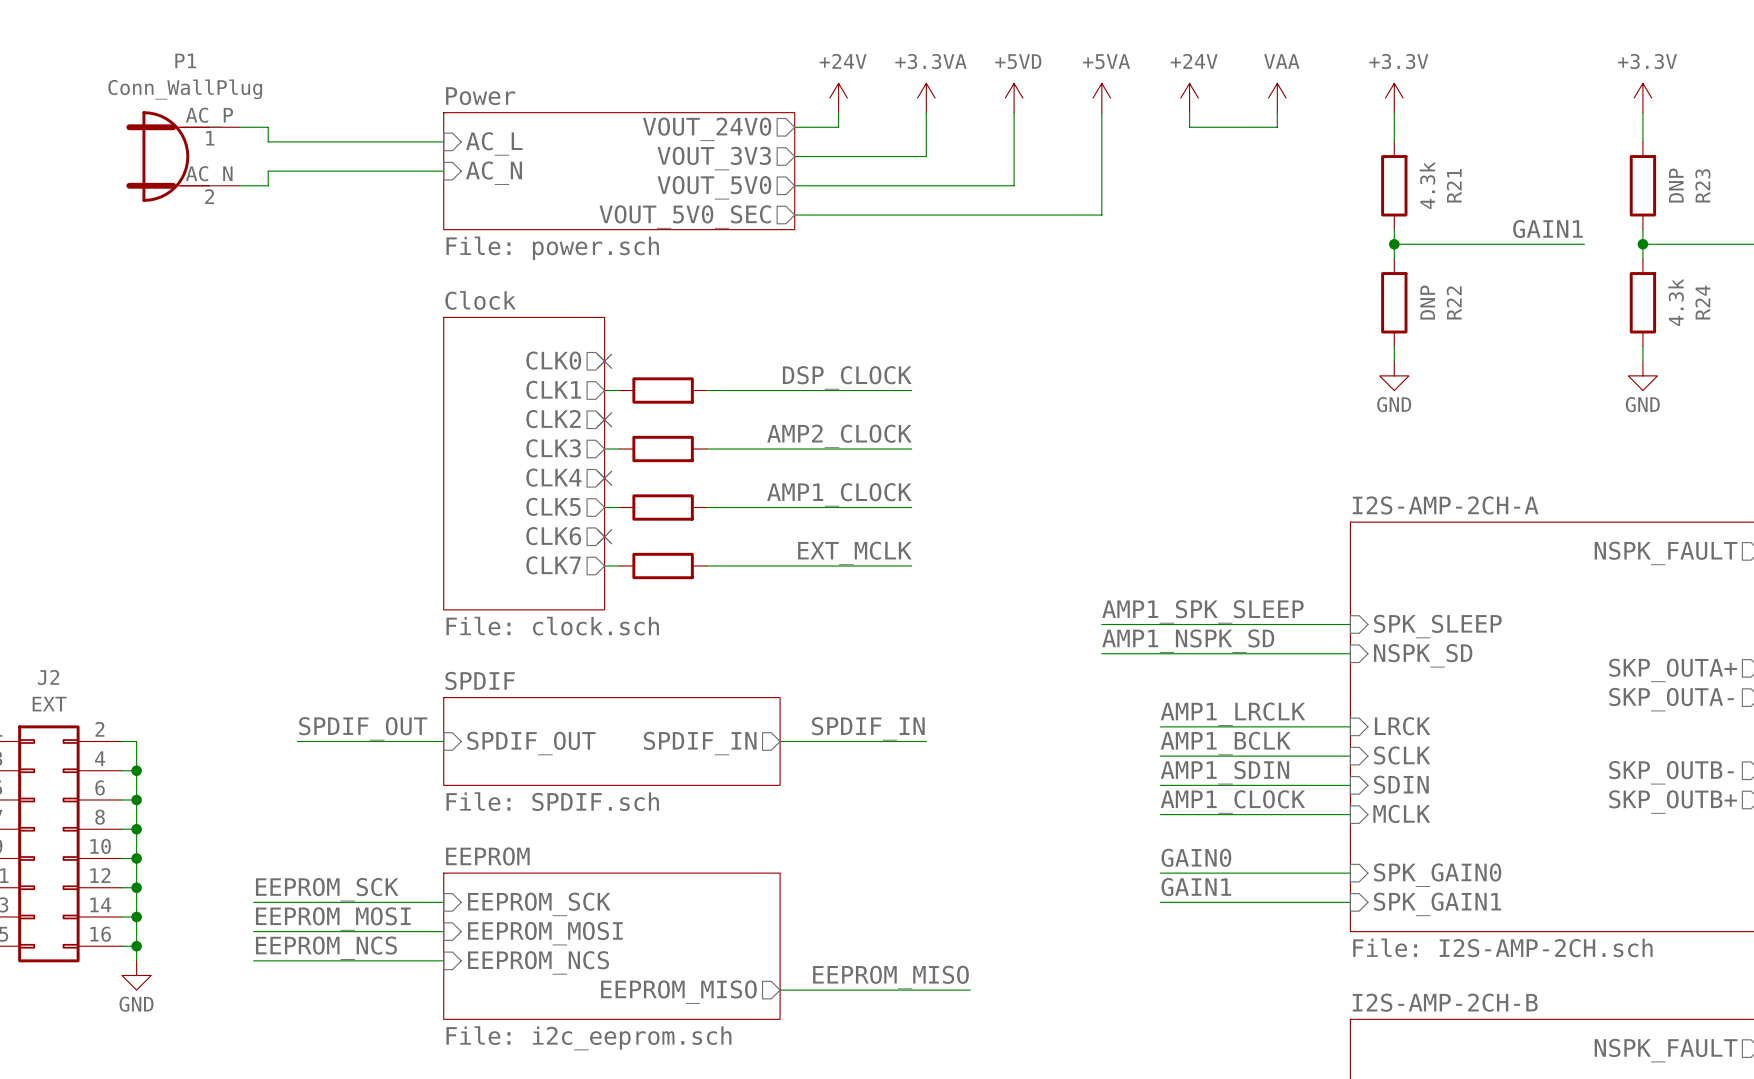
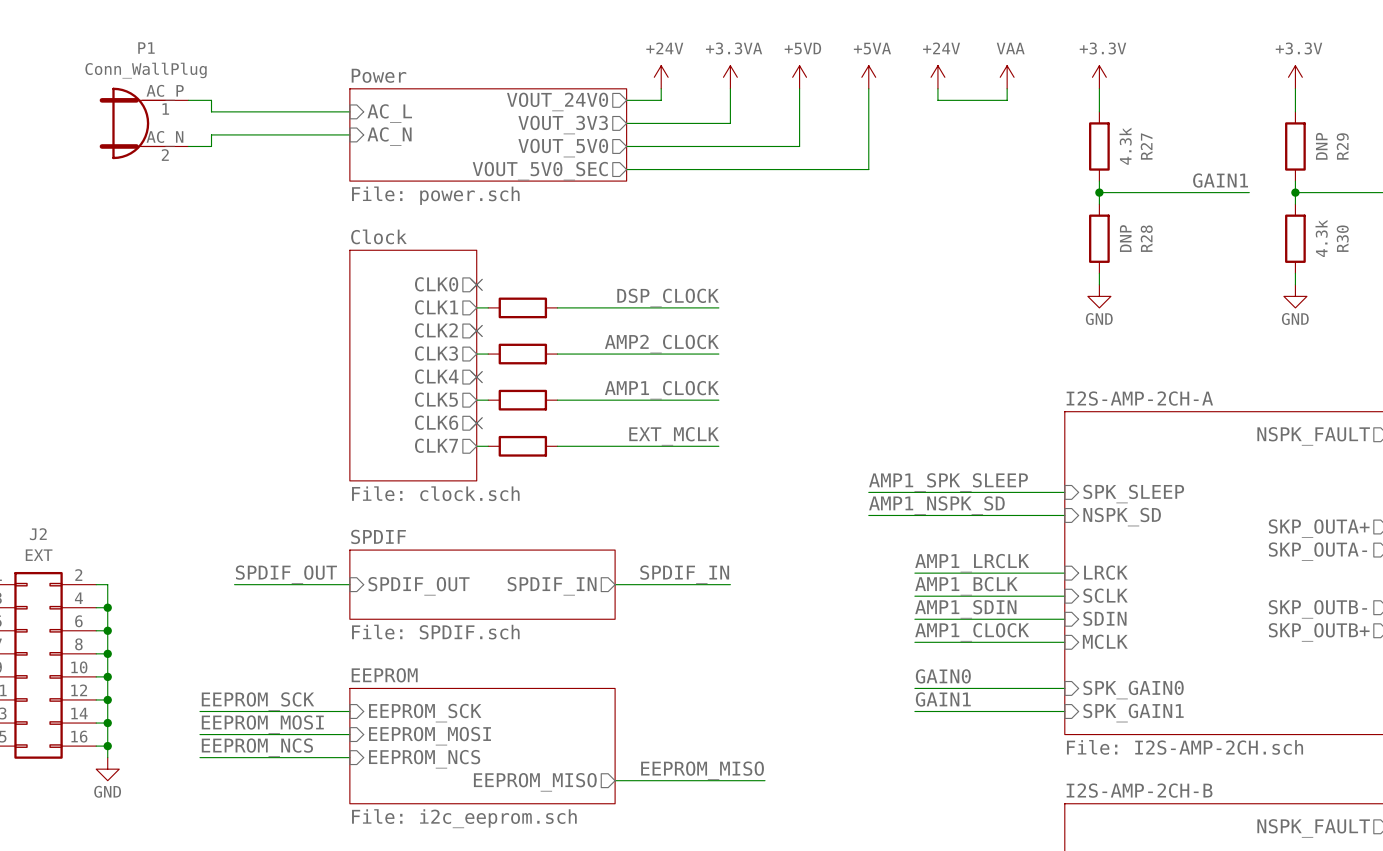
R21 name: R21 (1454, 185) -> R27 (1146, 146)
R23 name: R23 (1702, 185) -> R29 (1342, 146)
R22 name: R22 (1454, 302) -> R28 (1146, 238)
R24 name: R24 (1702, 302) -> R30 (1342, 238)

